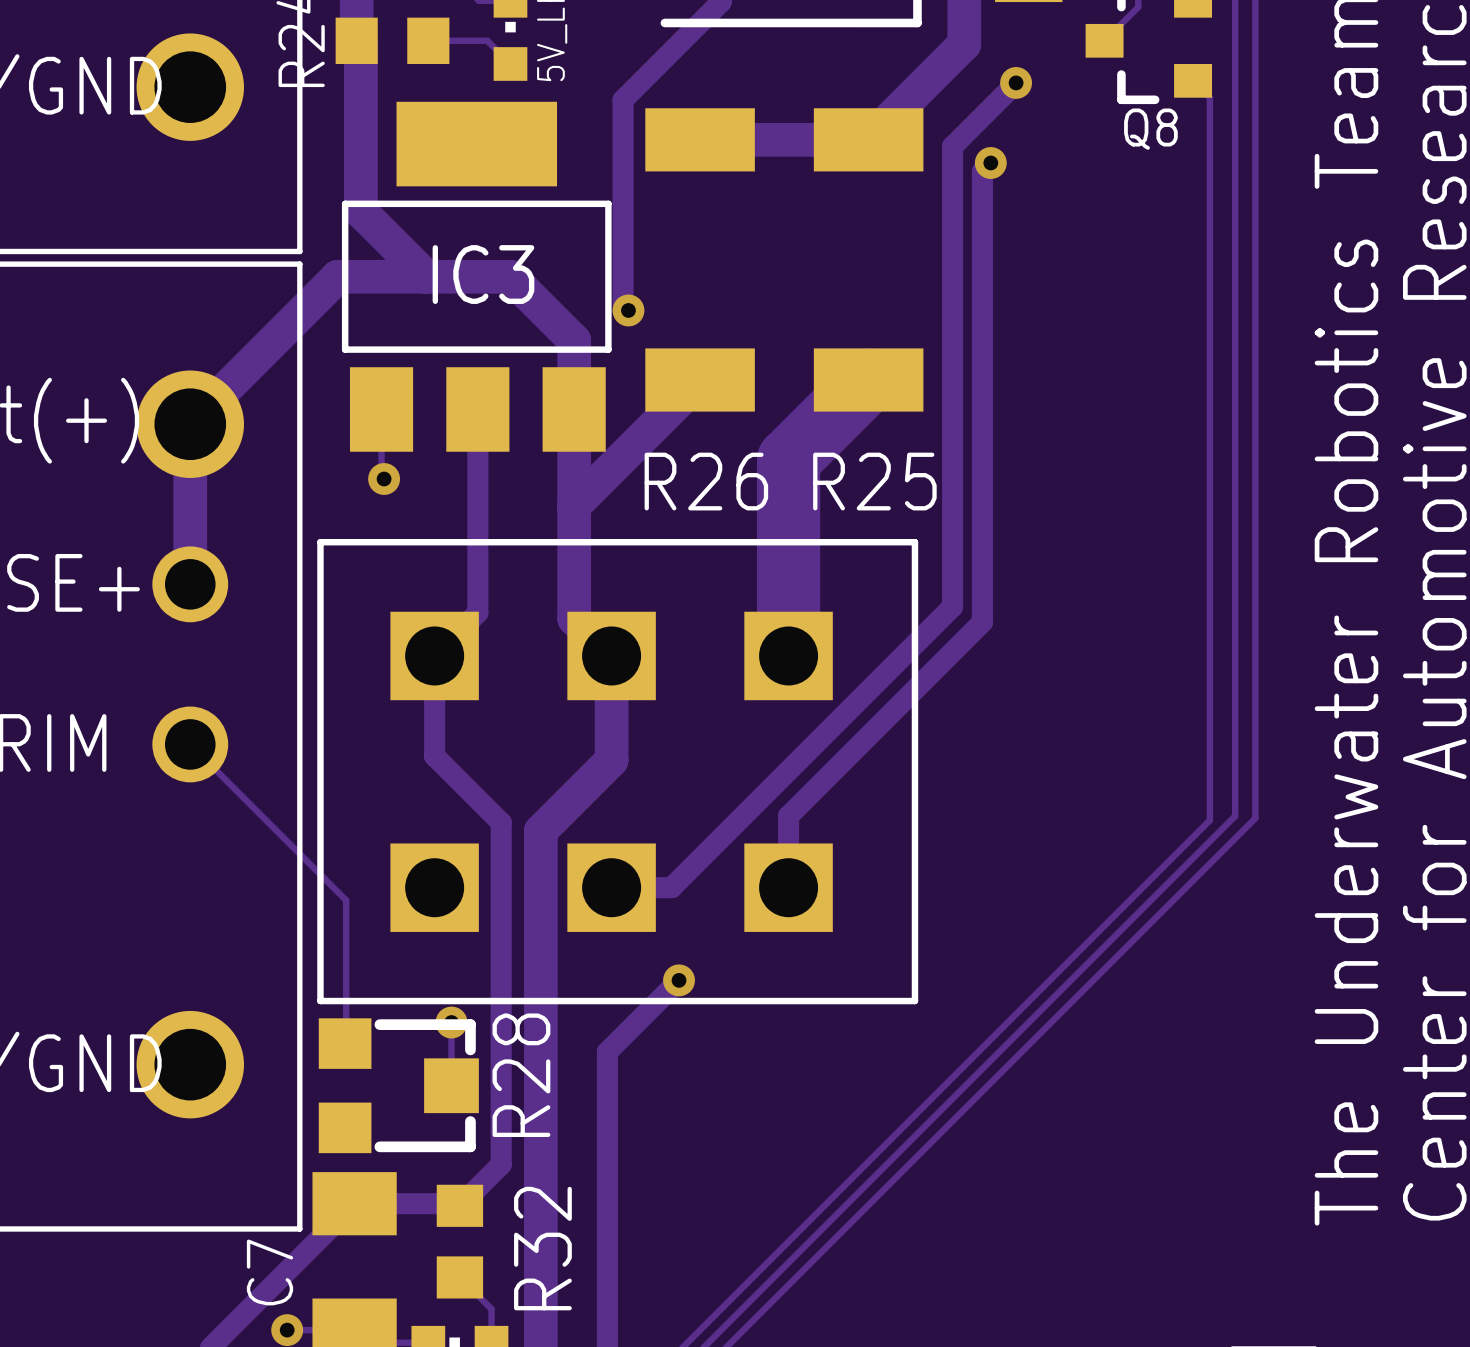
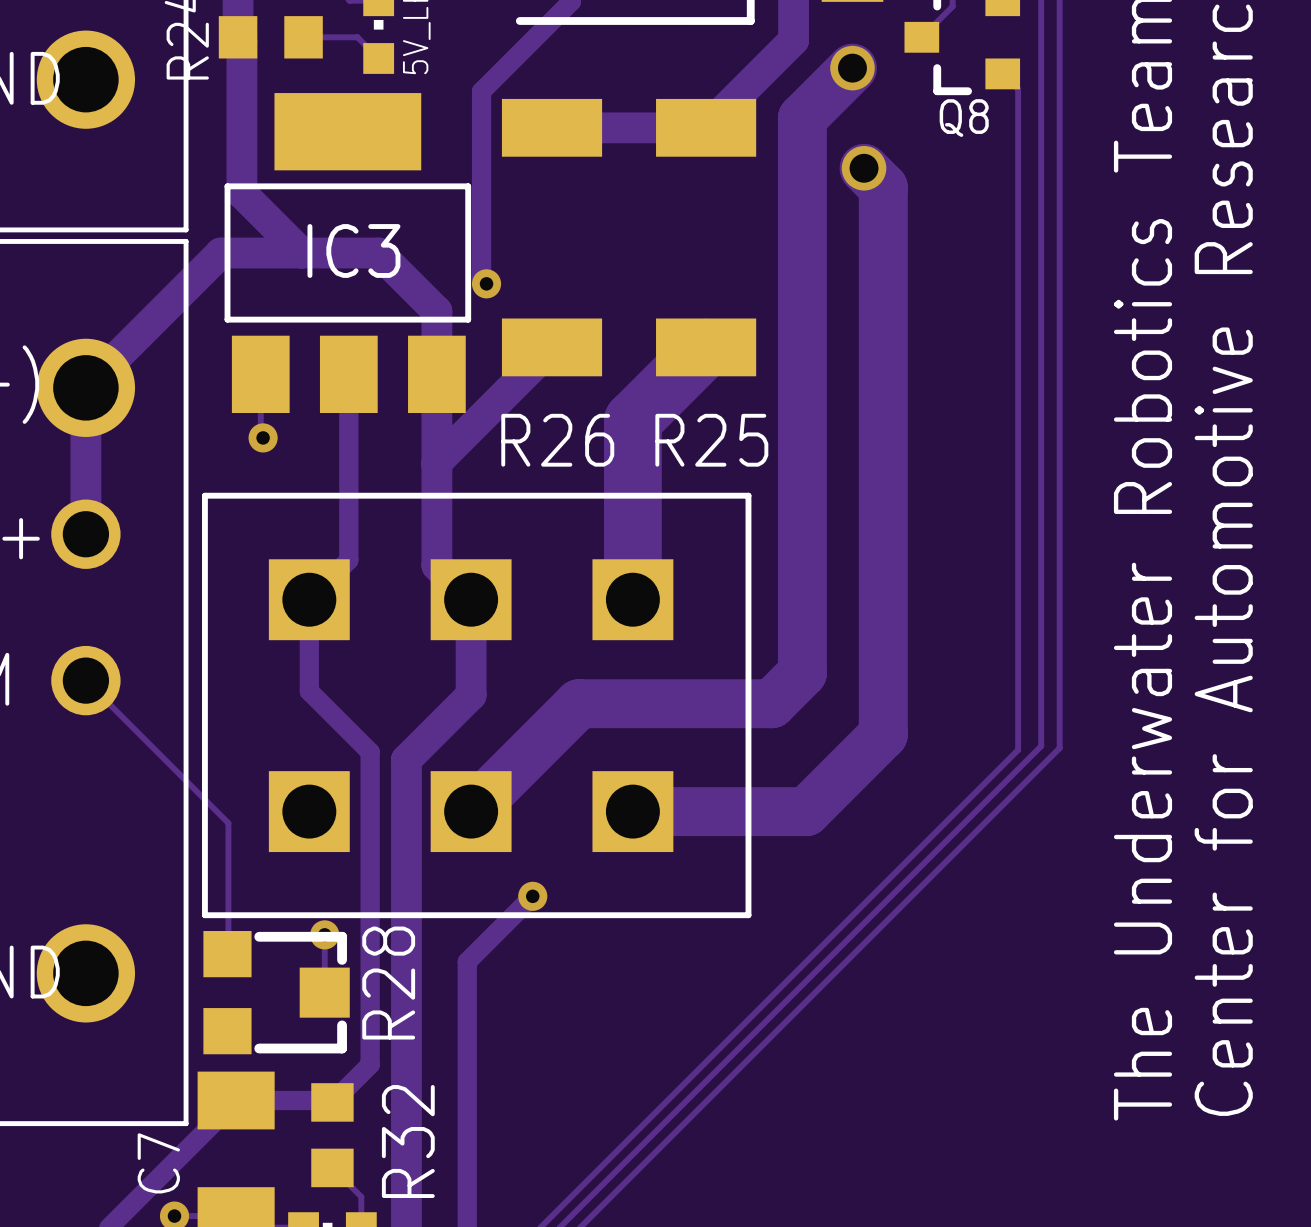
via size: [1000, 67, 1033, 99] -> [830, 45, 875, 91]
track: (1016, 82) (952, 146) (952, 606) (671, 887) (611, 887) -> (852, 68) (802, 118) (802, 672) (771, 703) (578, 703) (471, 811)
track: (990, 163) (982, 171) (982, 622) (788, 816) (788, 887) -> (864, 168) (883, 187) (883, 734) (806, 811) (632, 811)
via: (990, 163) -> none
via: none -> (864, 168)

